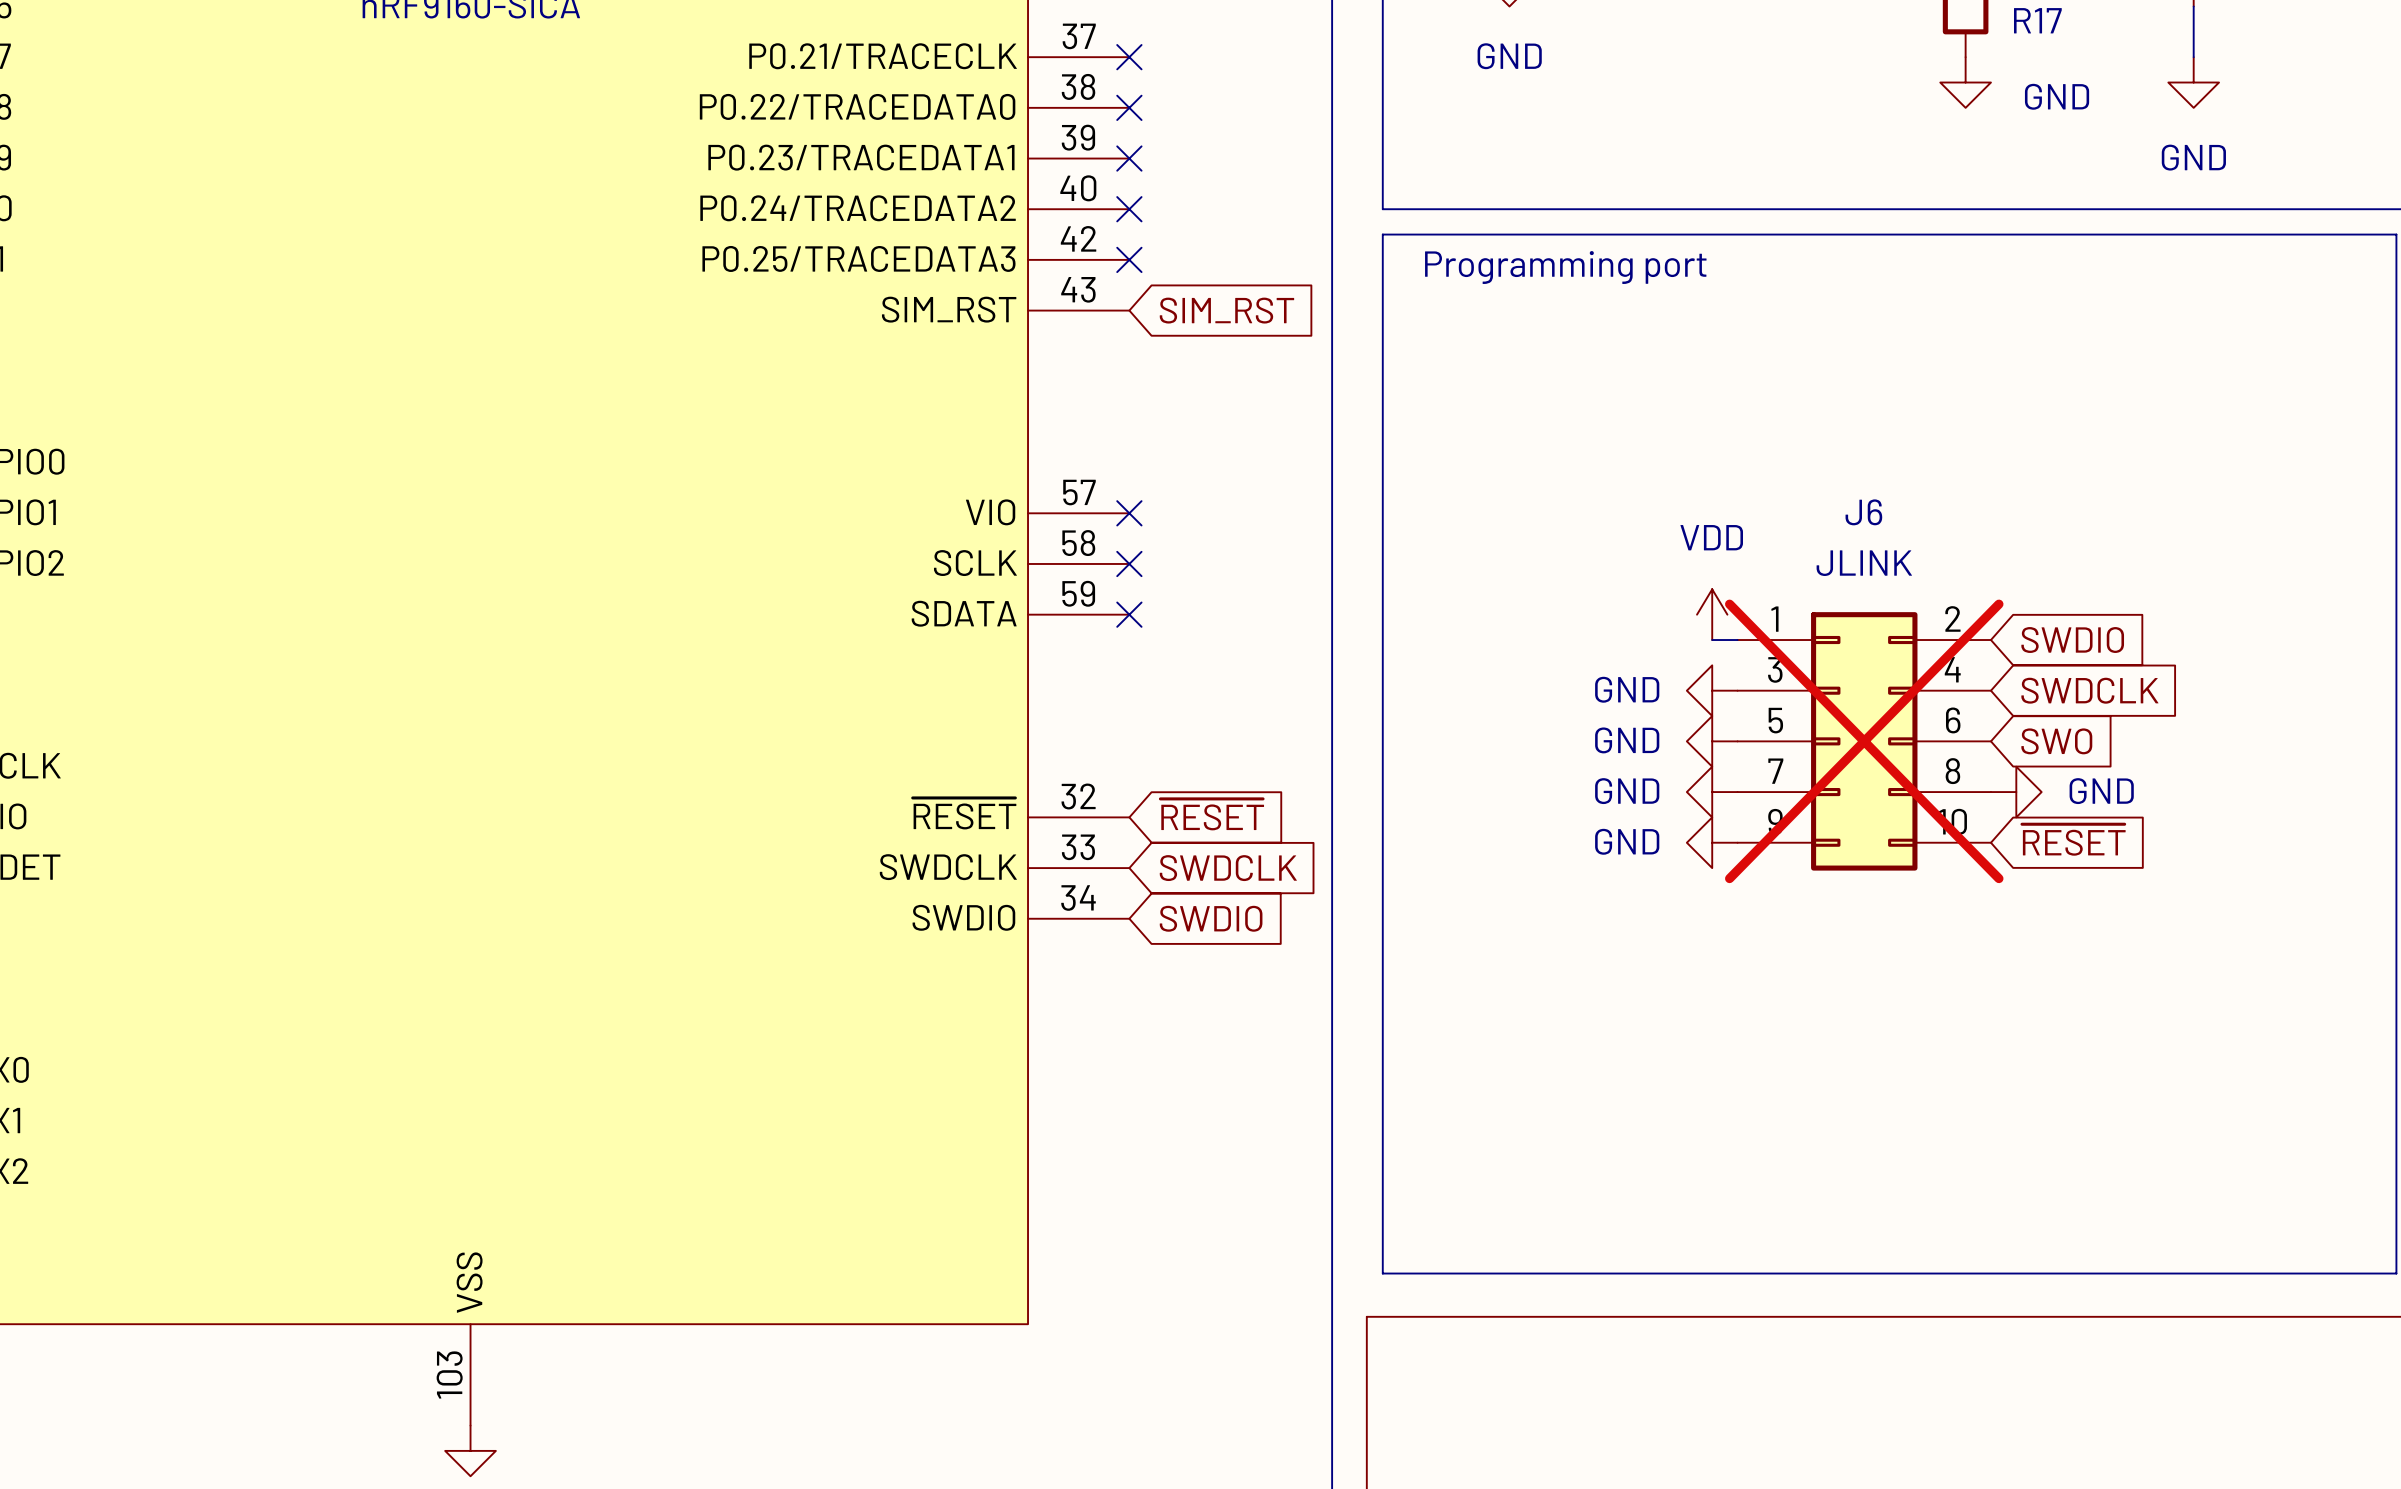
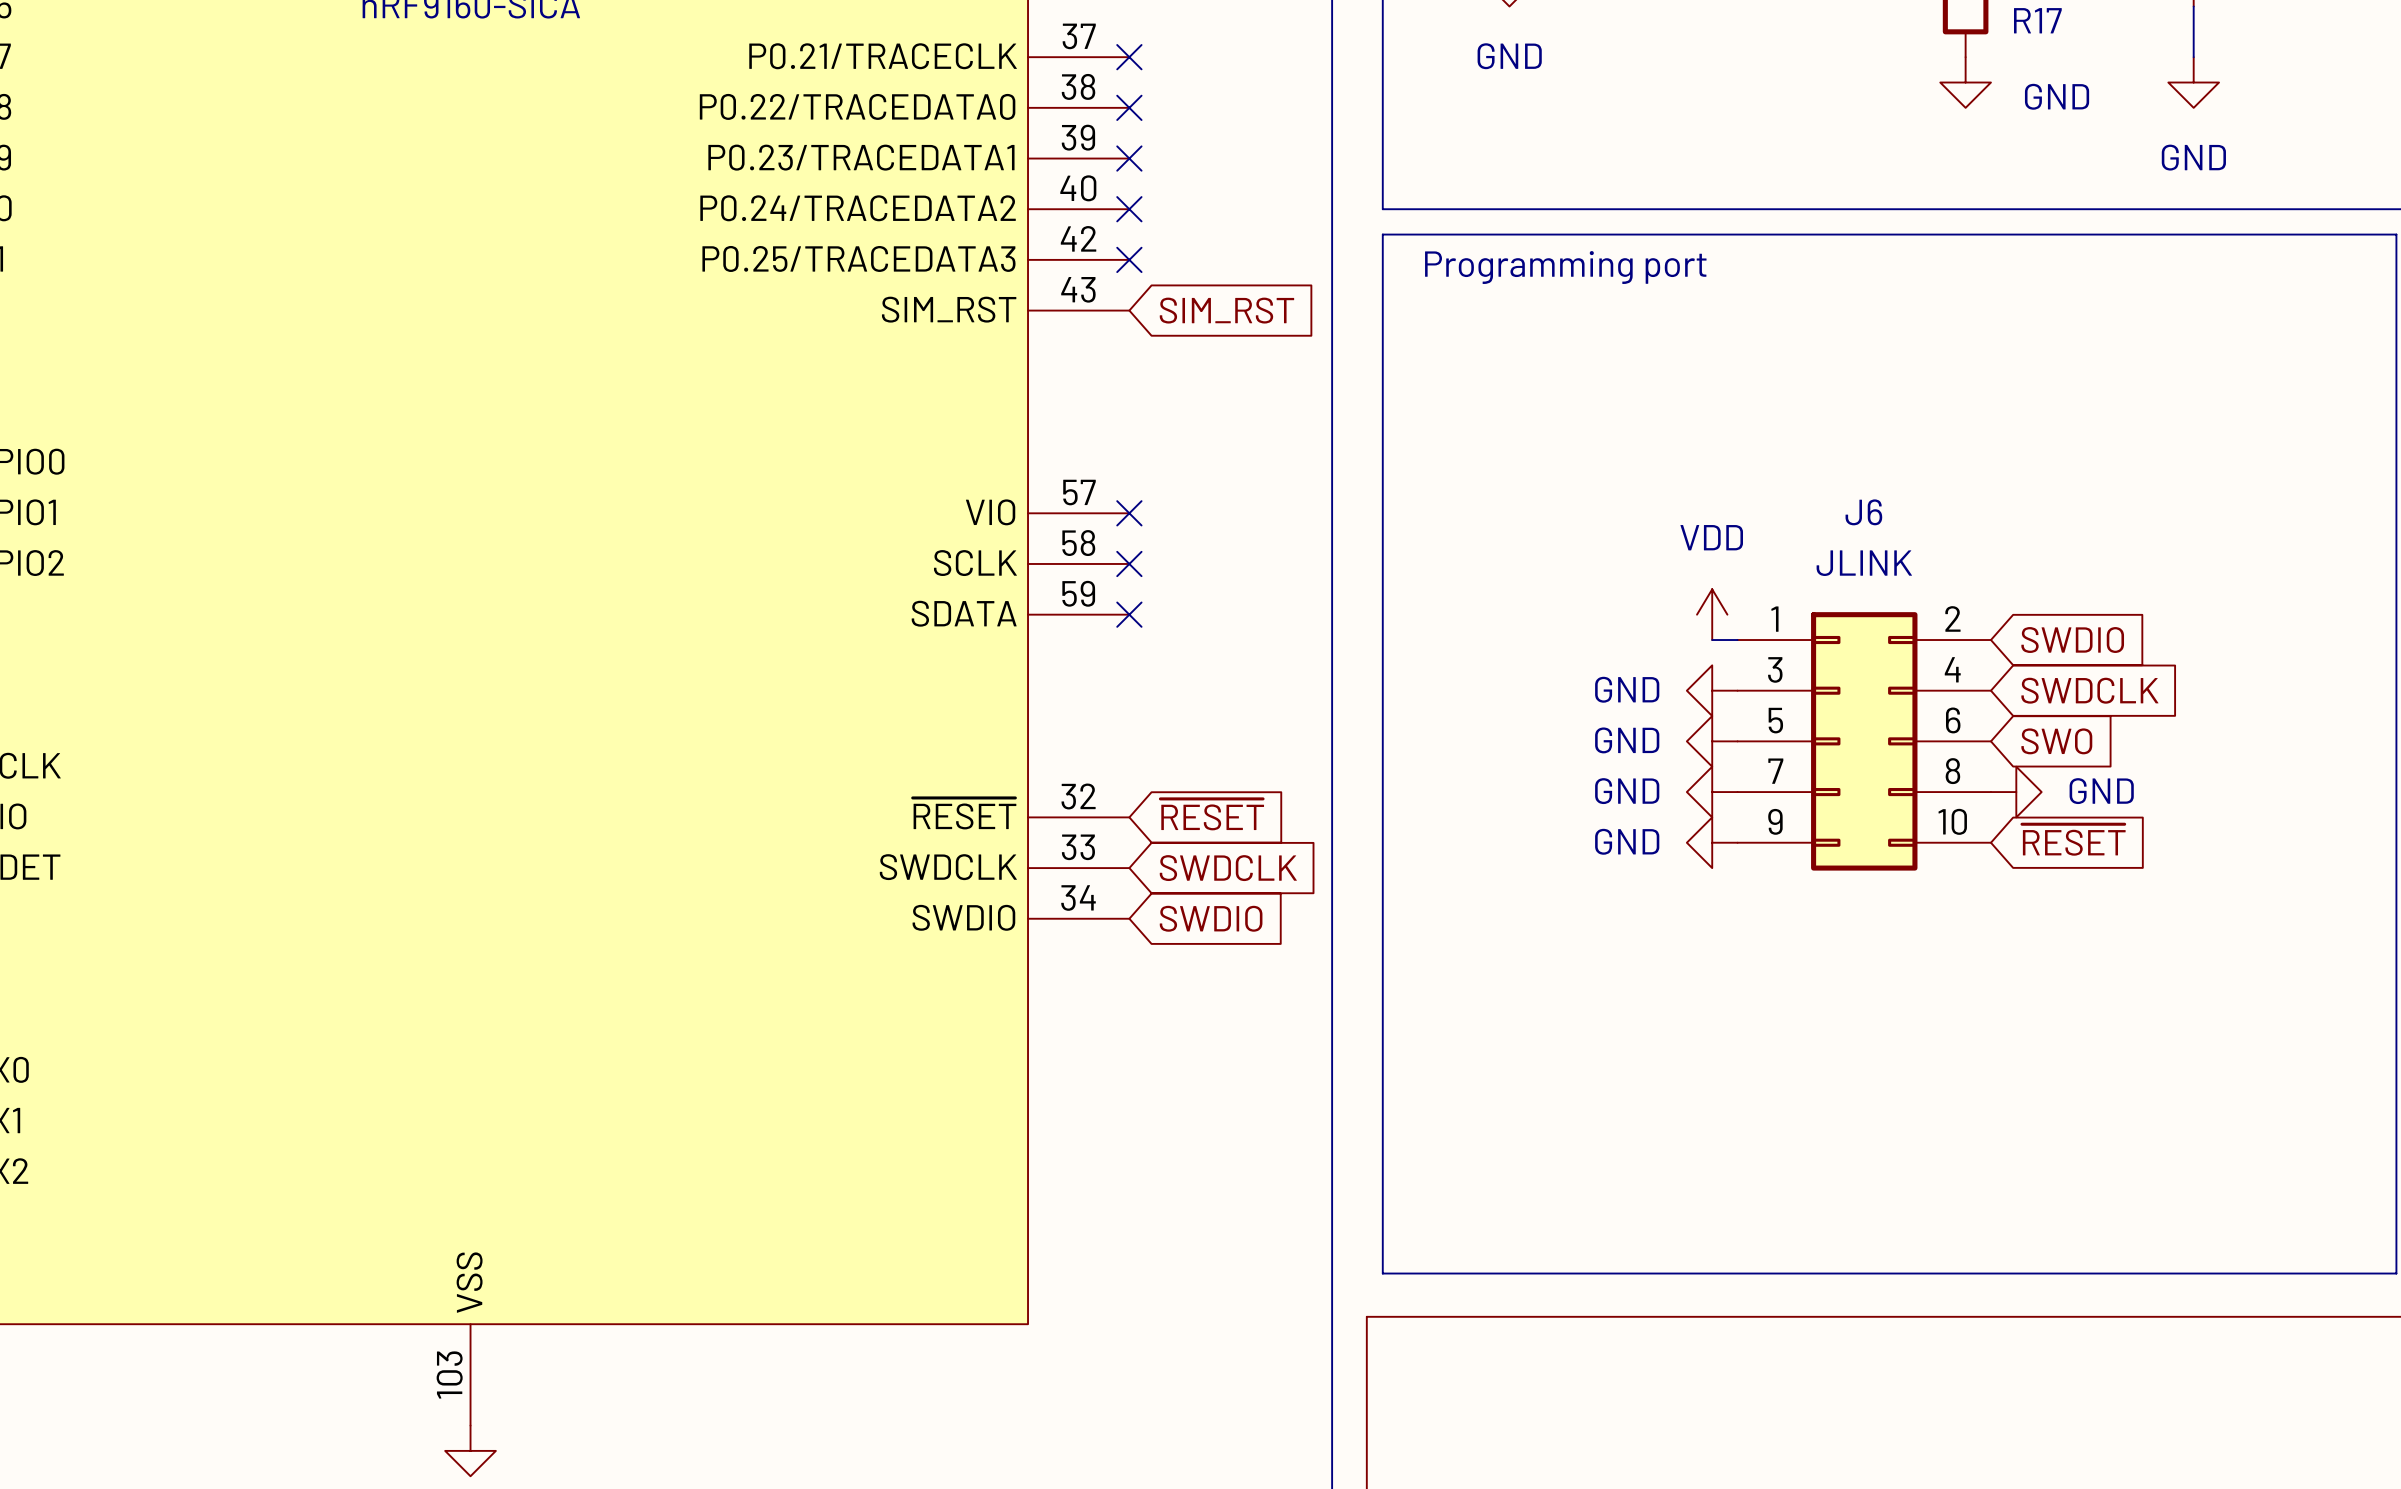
J6 do-not-place cross: (1864, 741) -> none

